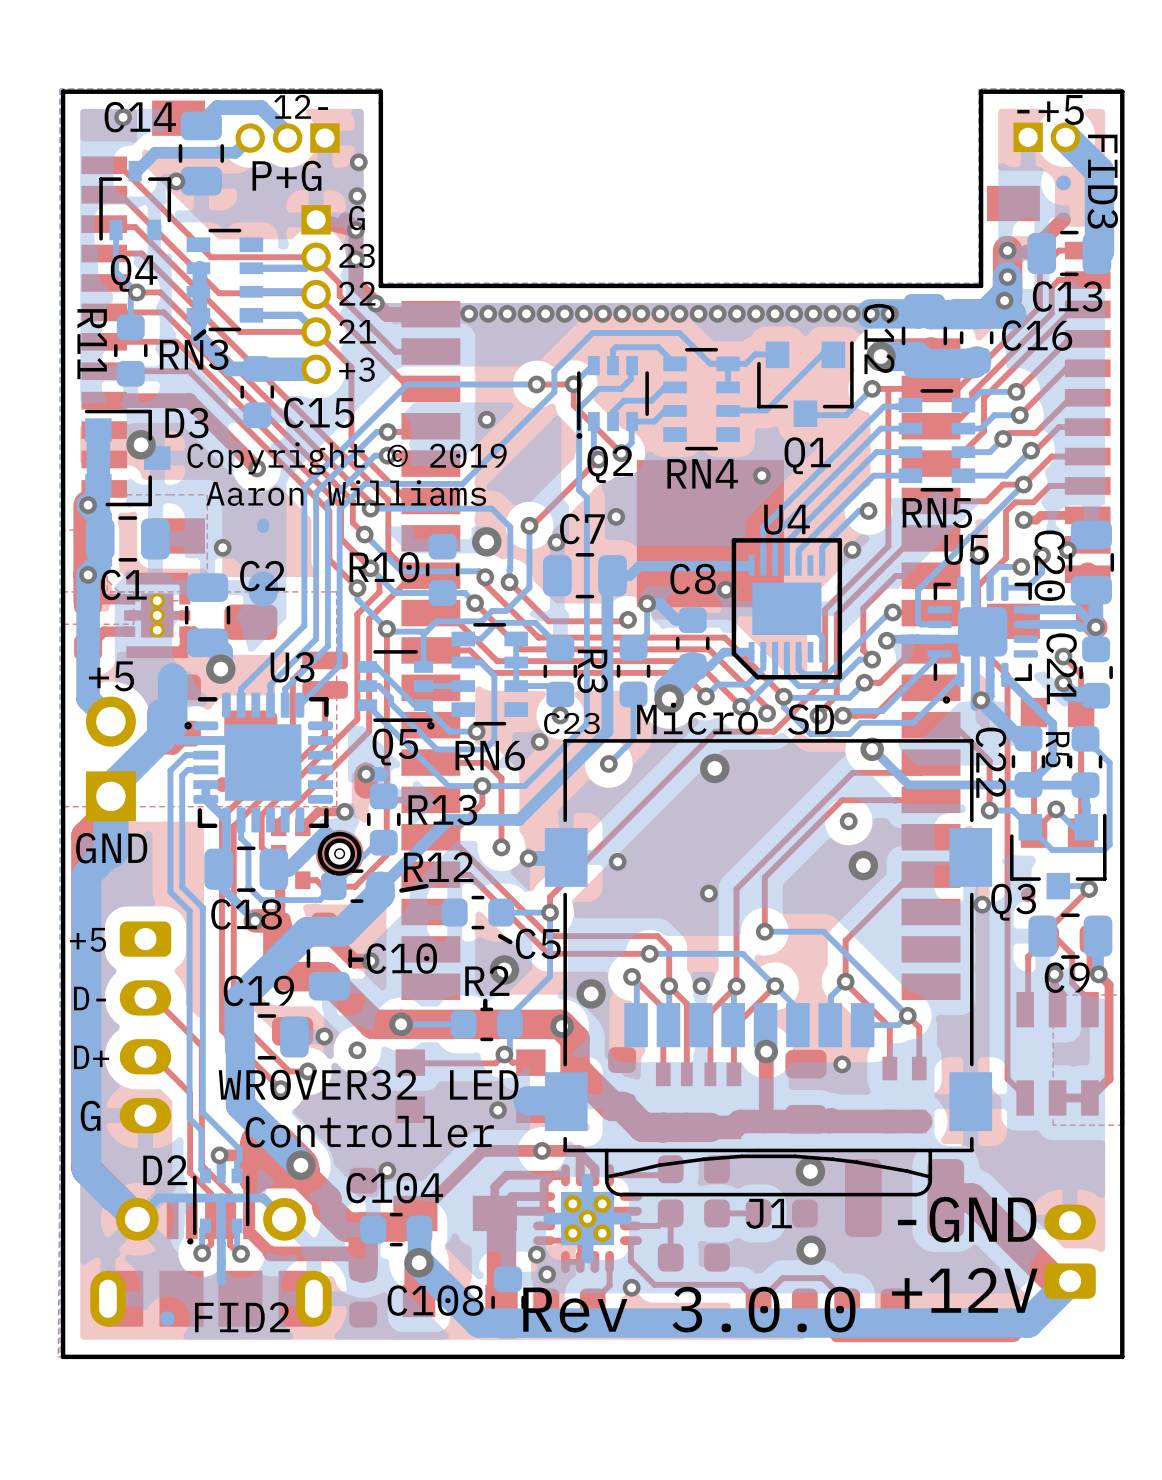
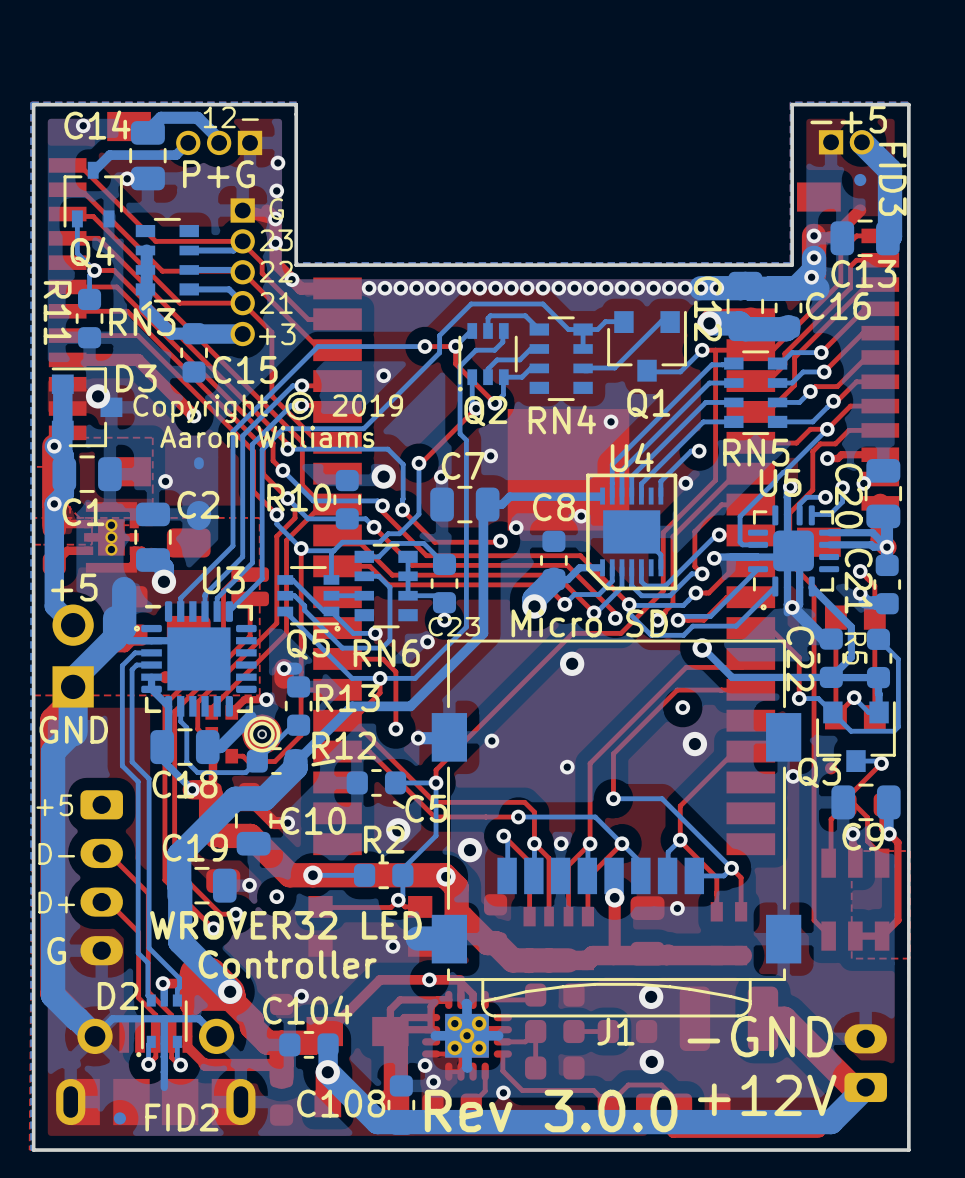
bottom track: (693, 619) (675, 619) (659, 603) (647, 603) (647, 634) (633, 647) -> none
R3: (633, 671) -> none
bottom track: (633, 696) (633, 739) (608, 763) -> none
via: (608, 763) -> none

